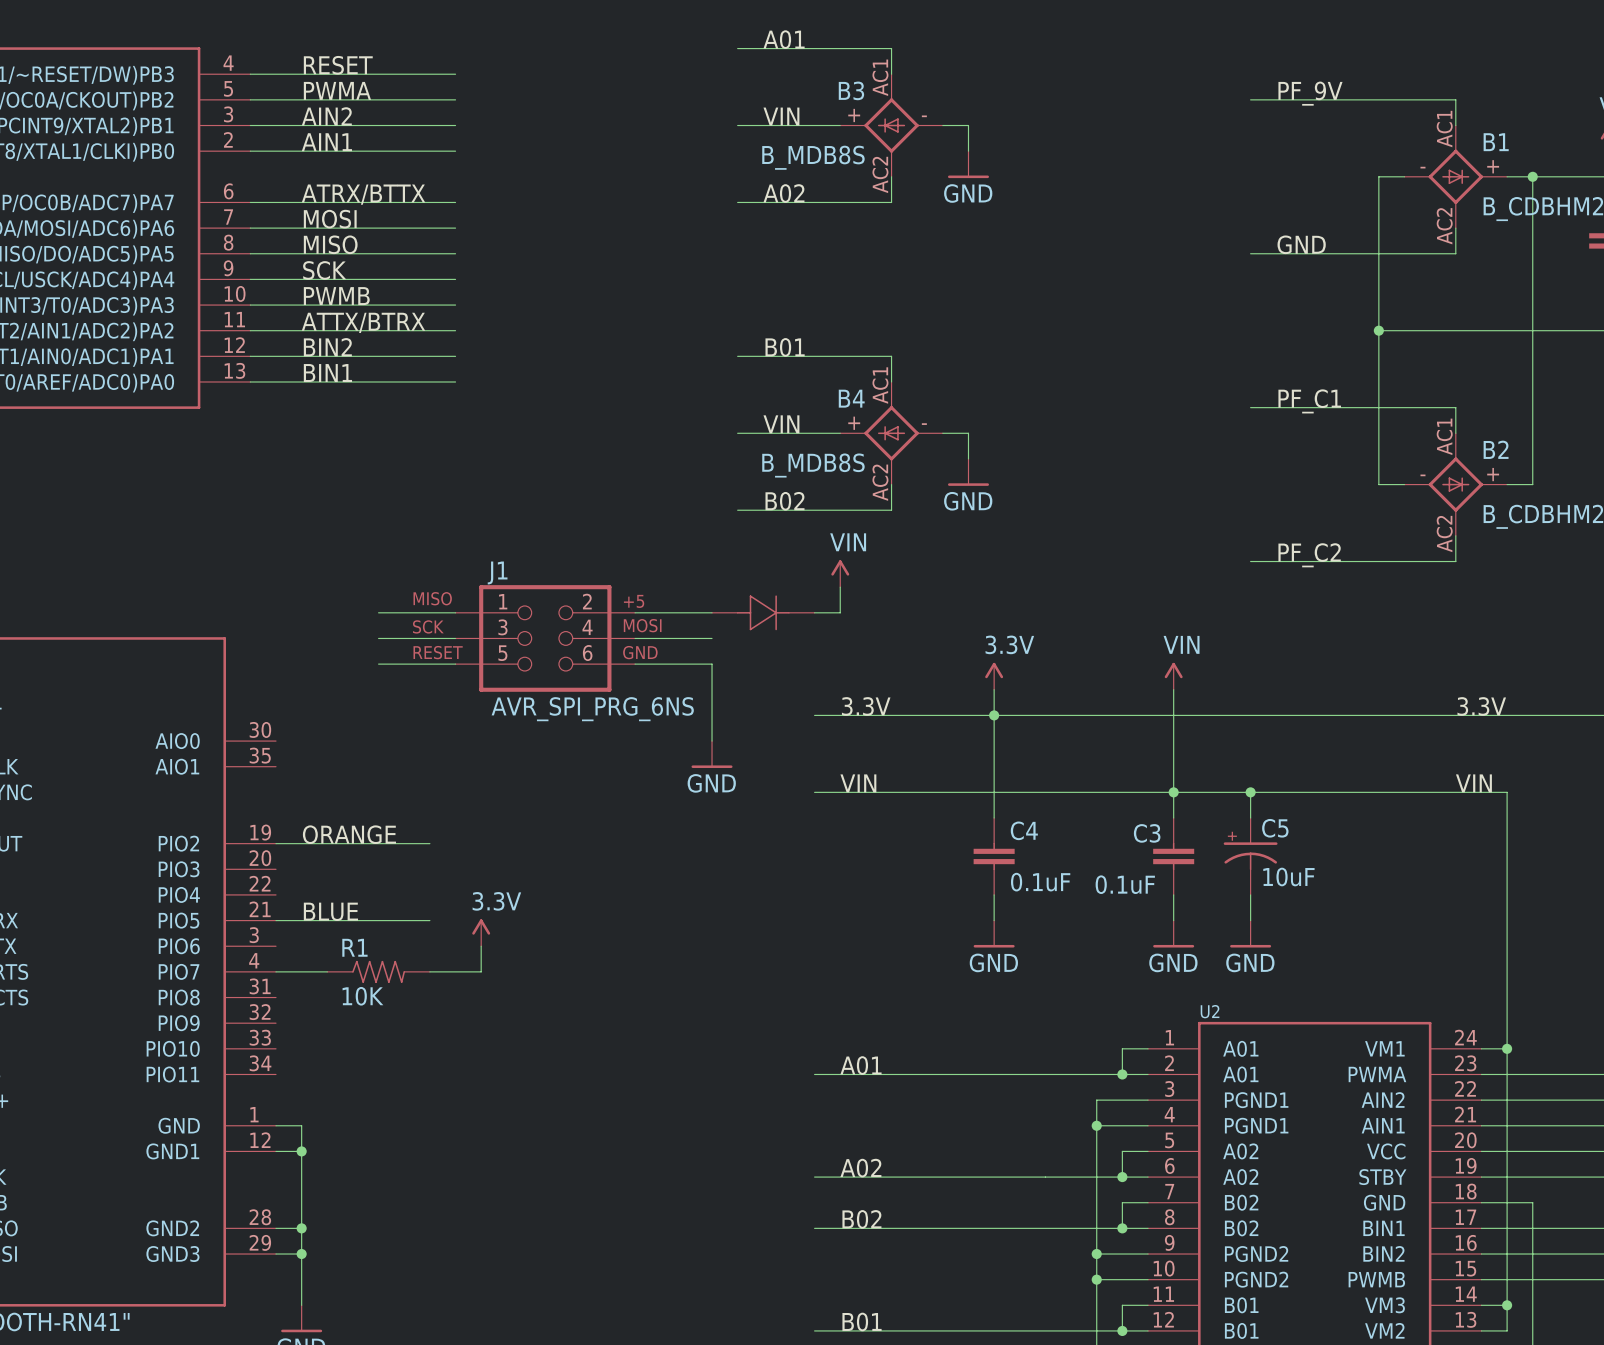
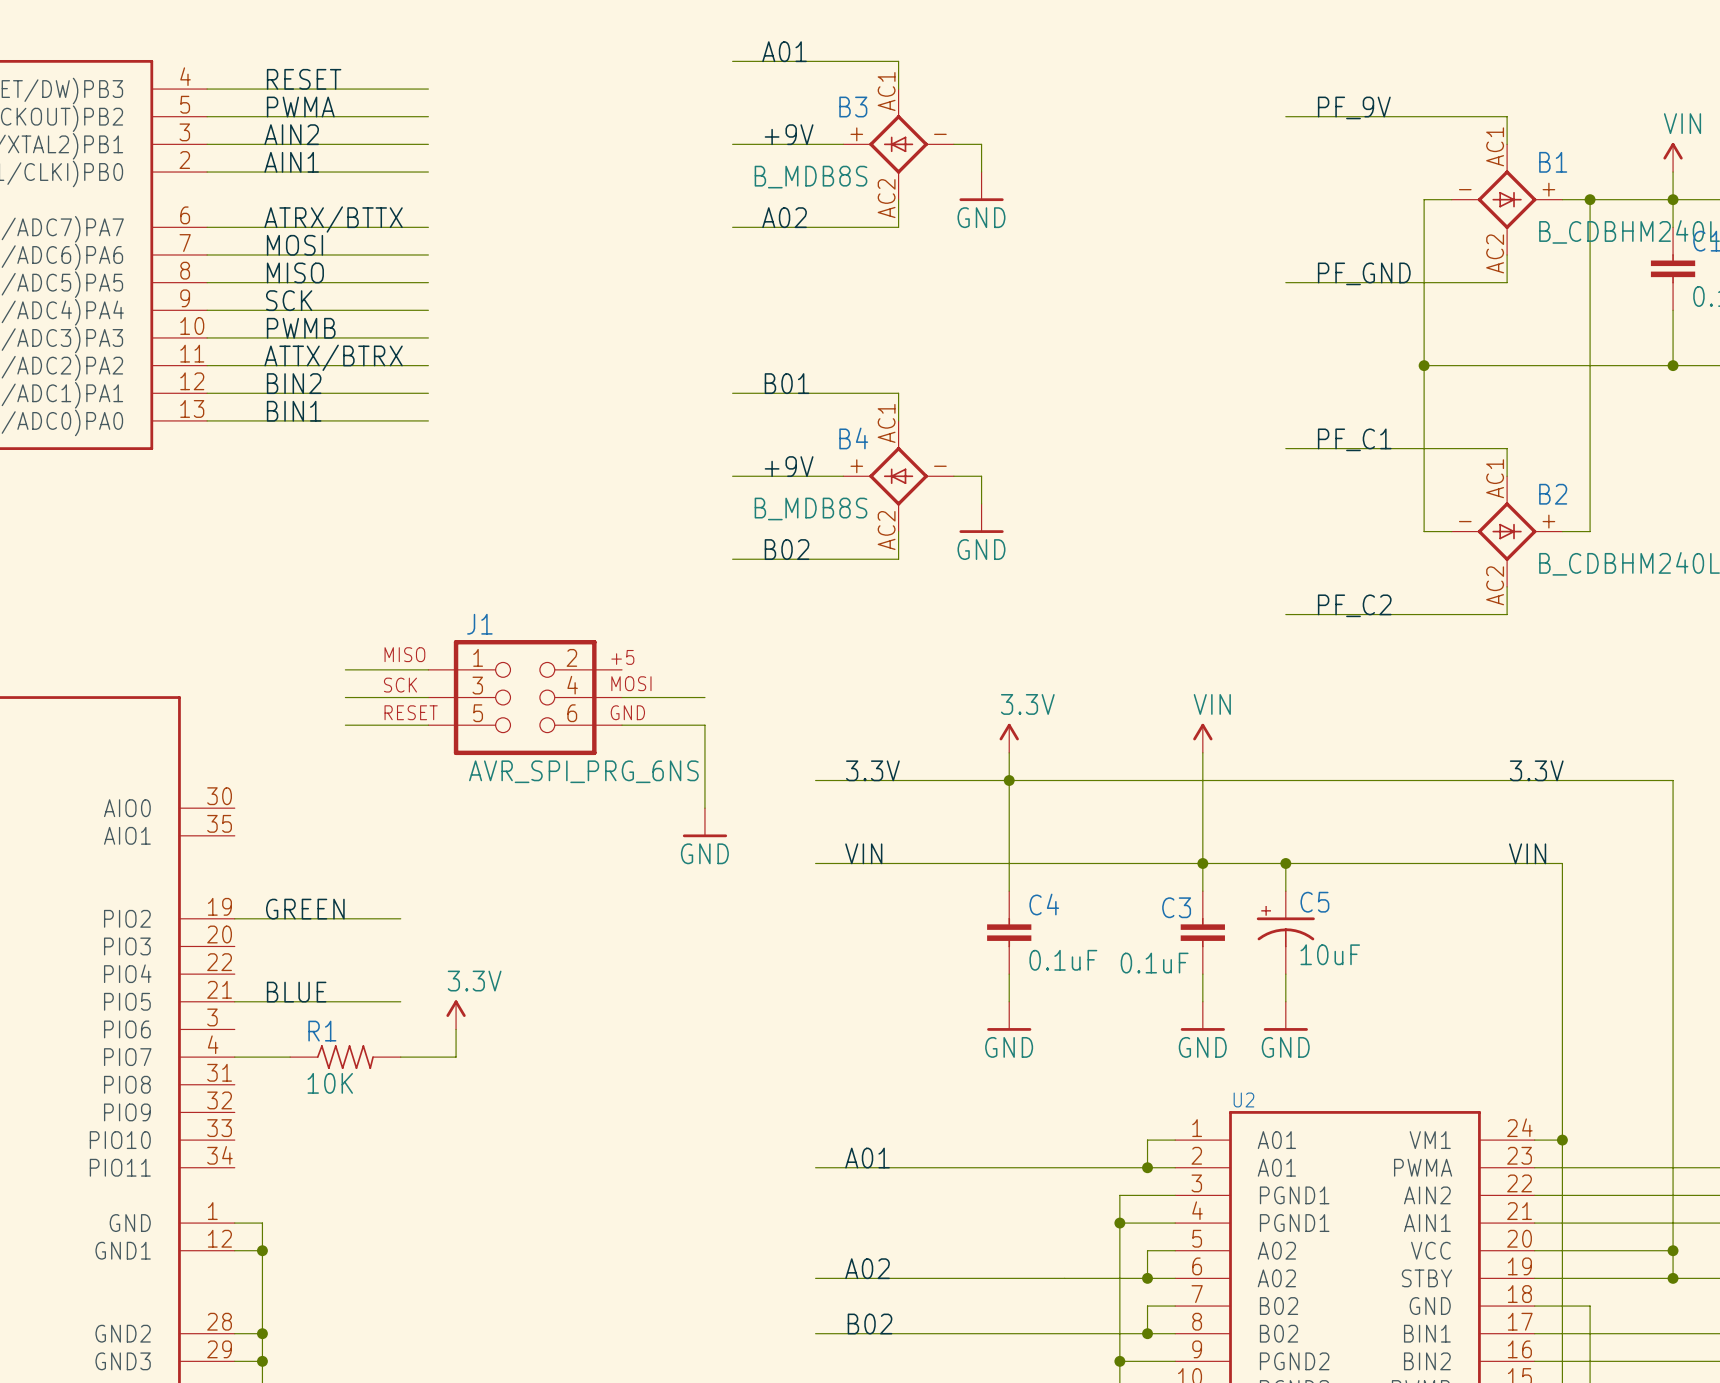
label: VIN (781, 116) -> +9V (789, 134)
label: GND (1301, 244) -> PF_GND (1364, 273)
label: VIN (781, 424) -> +9V (789, 466)
power symbol: VIN (840, 573) -> none
wire: (840, 587) (840, 612) (814, 612) -> none
wire: (635, 612) (712, 612) -> none
part: (763, 612) -> none
label: ORANGE (349, 834) -> GREEN (305, 909)

